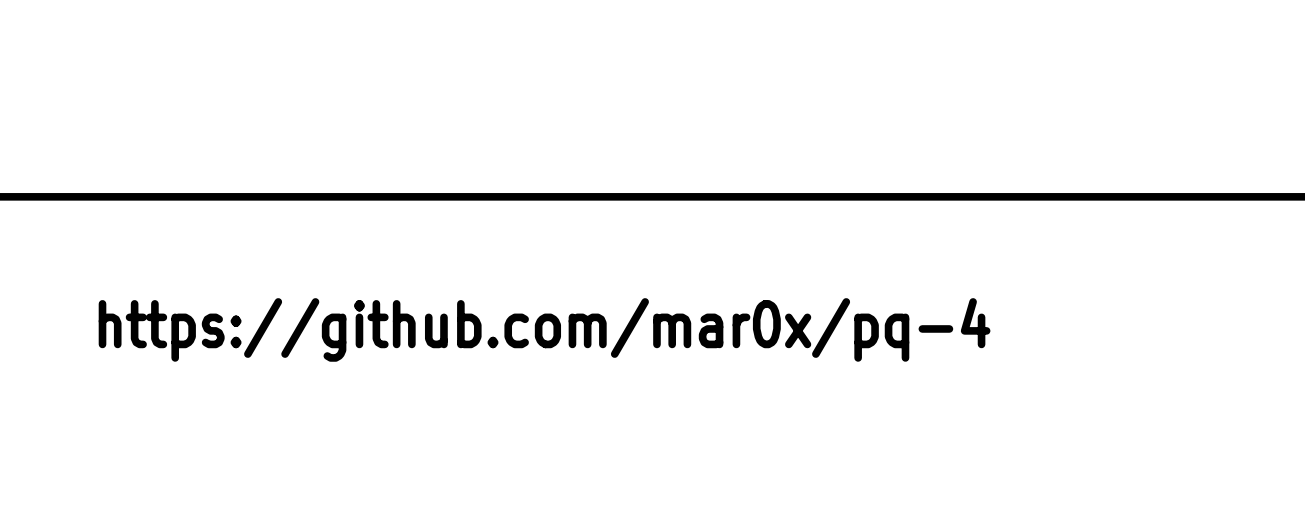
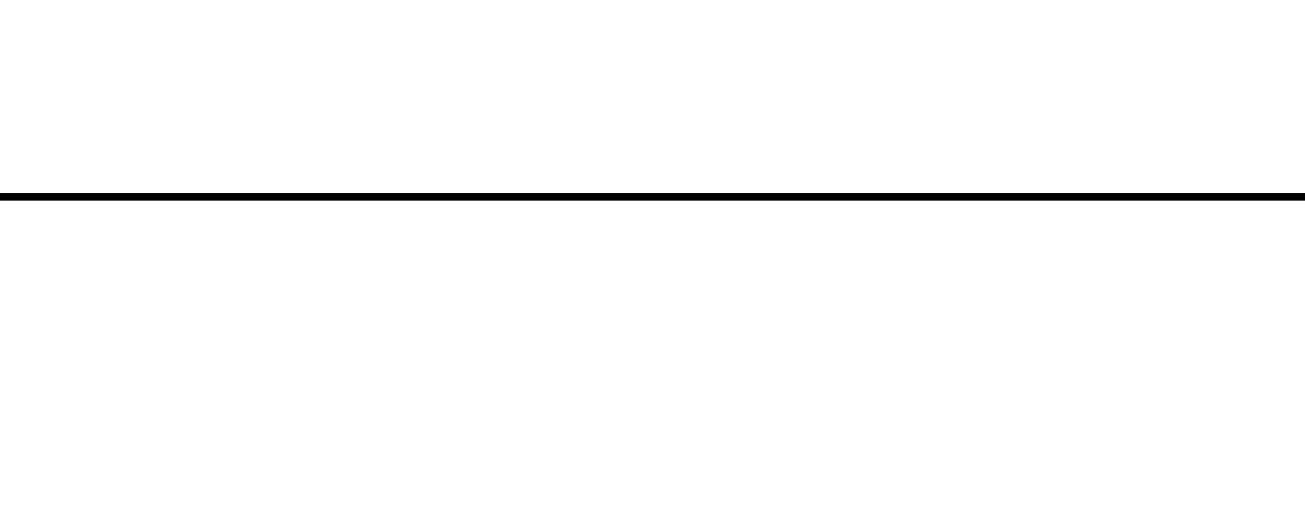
text: https://github.com/mar0x/pq-4 (544, 329) -> none

